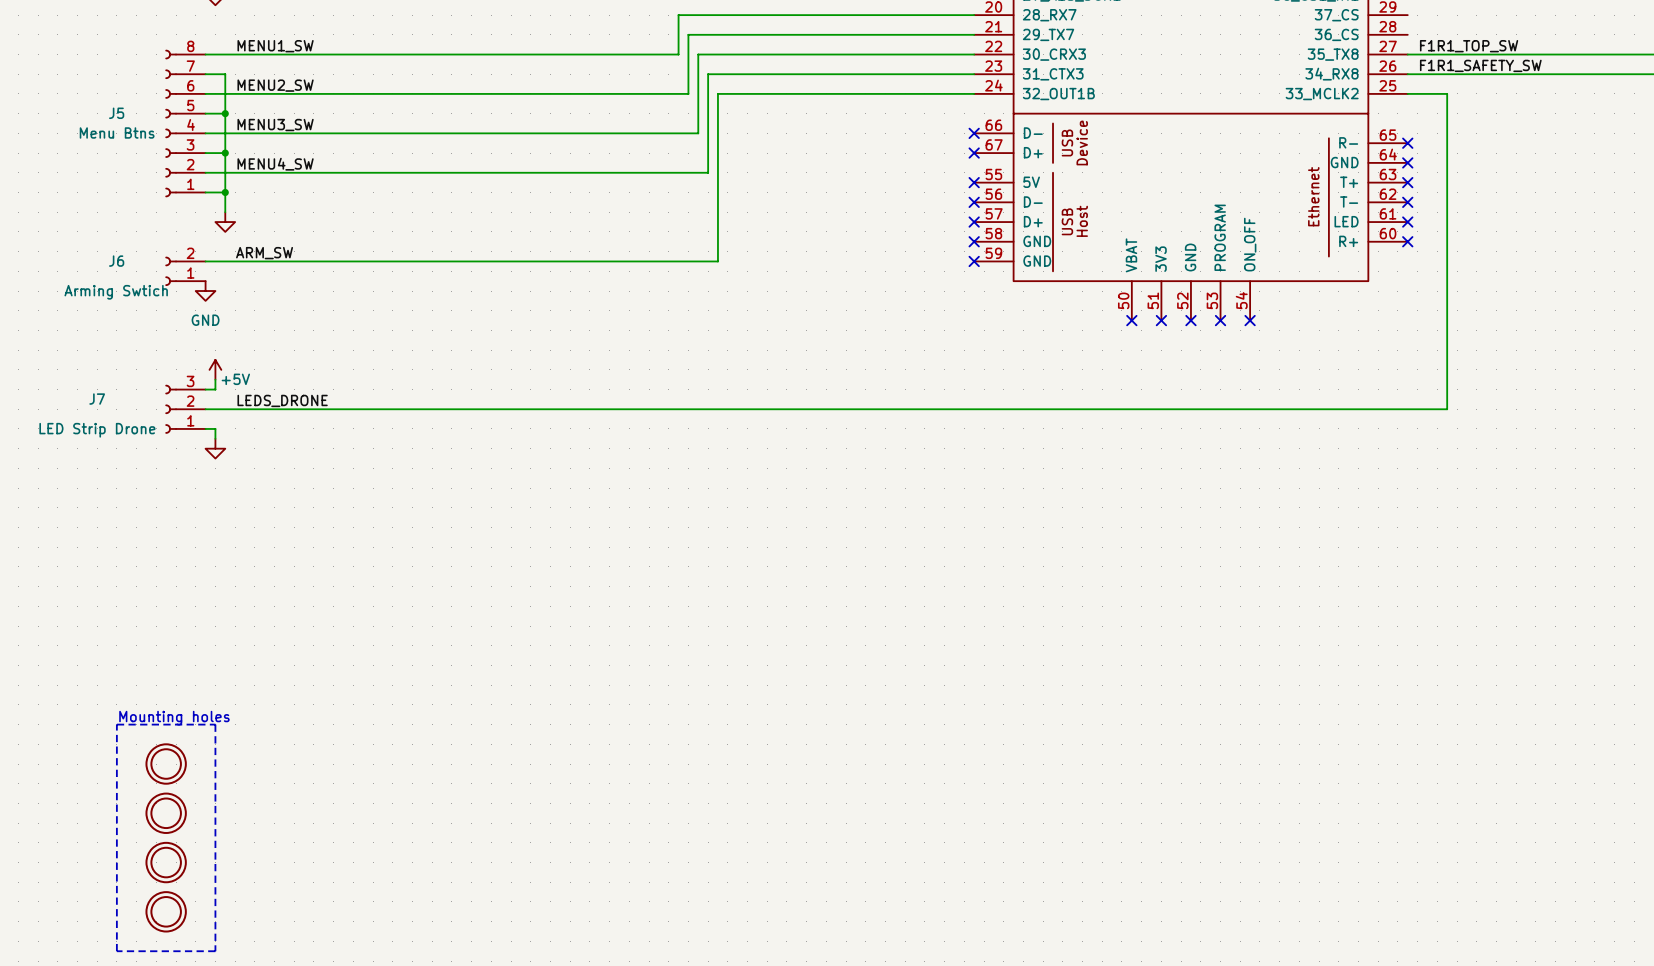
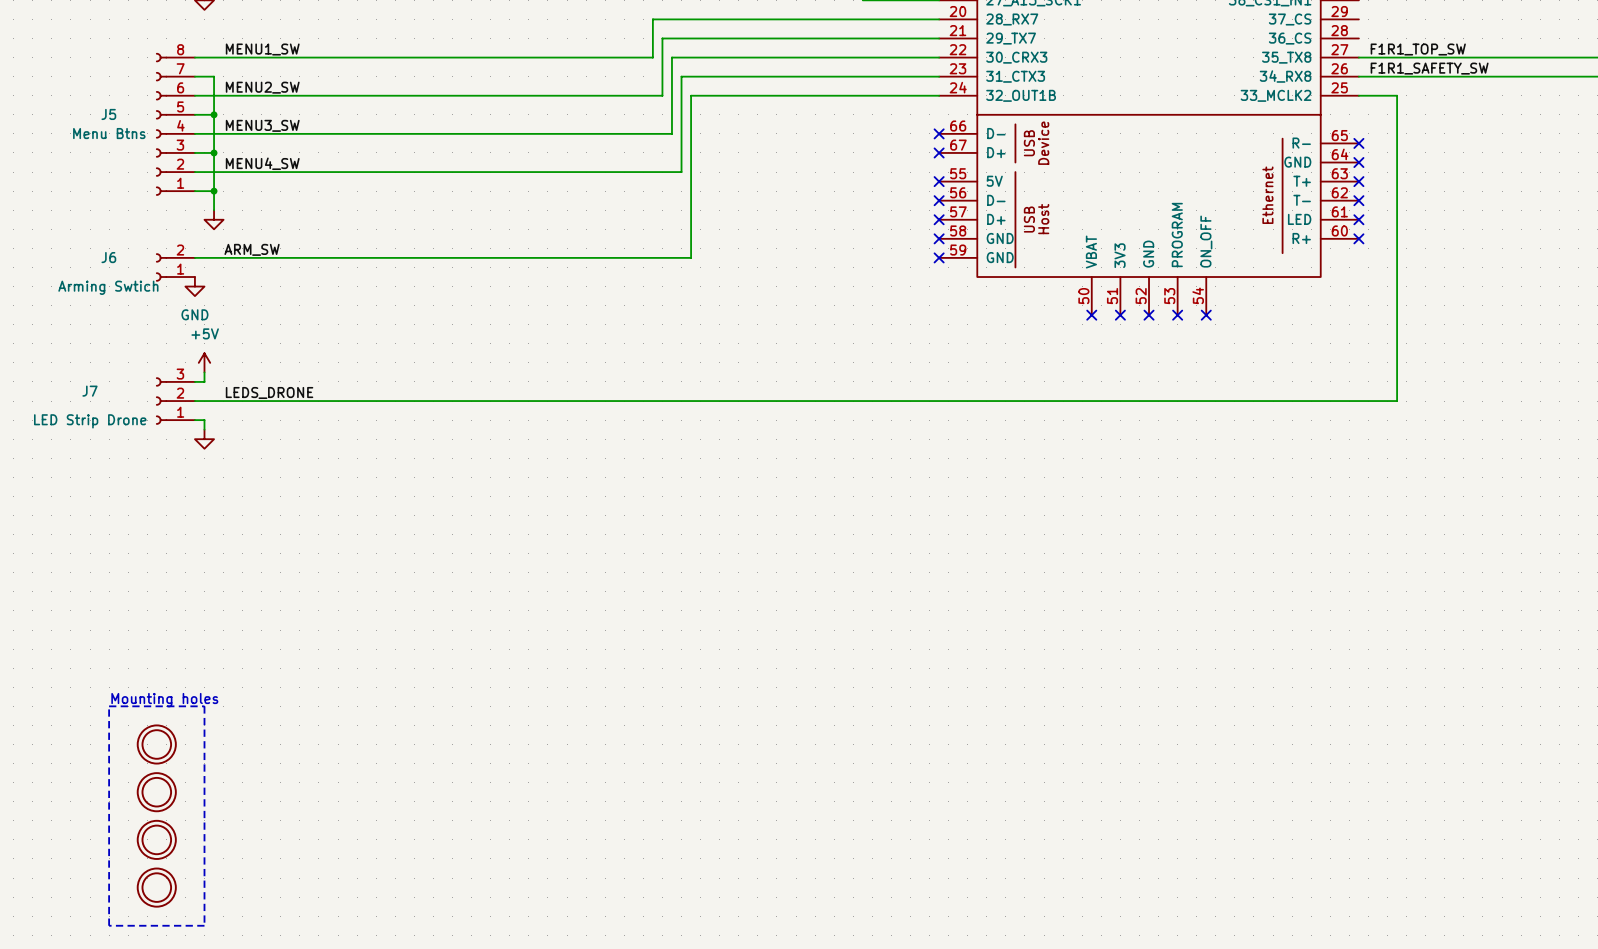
power symbol text position: +5V (235, 379) -> +5V (205, 333)

